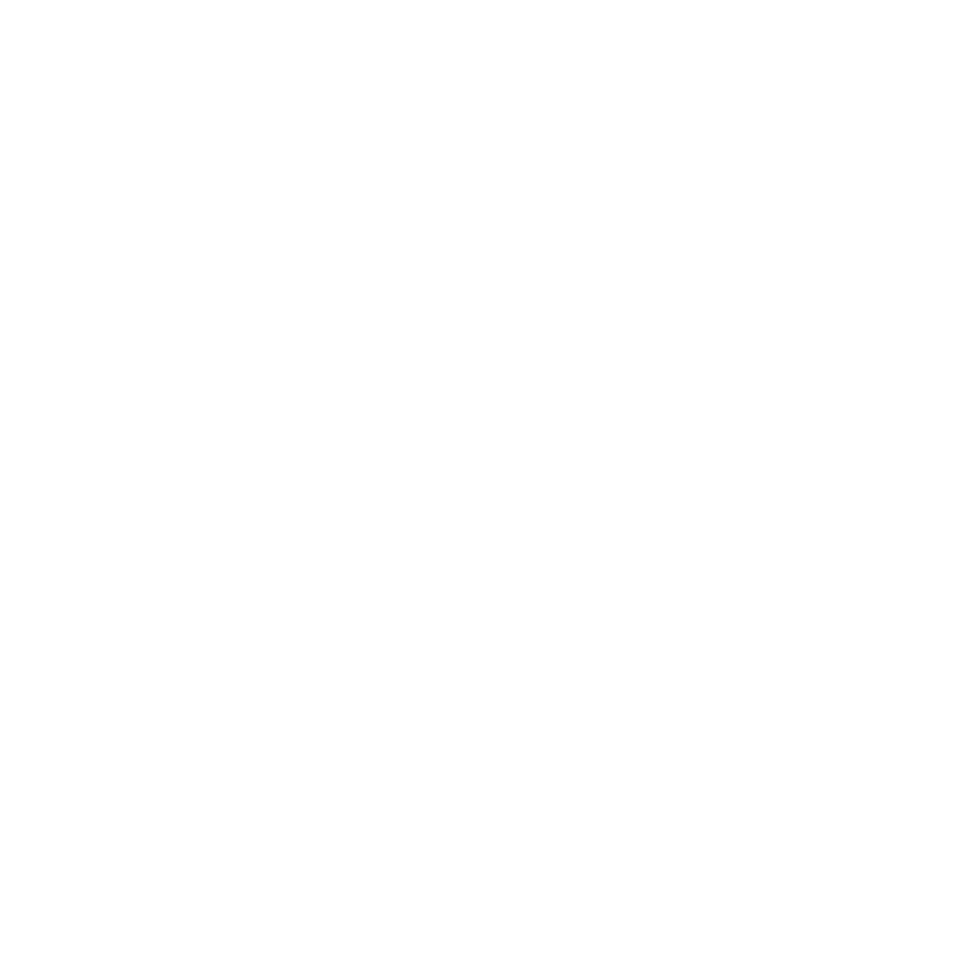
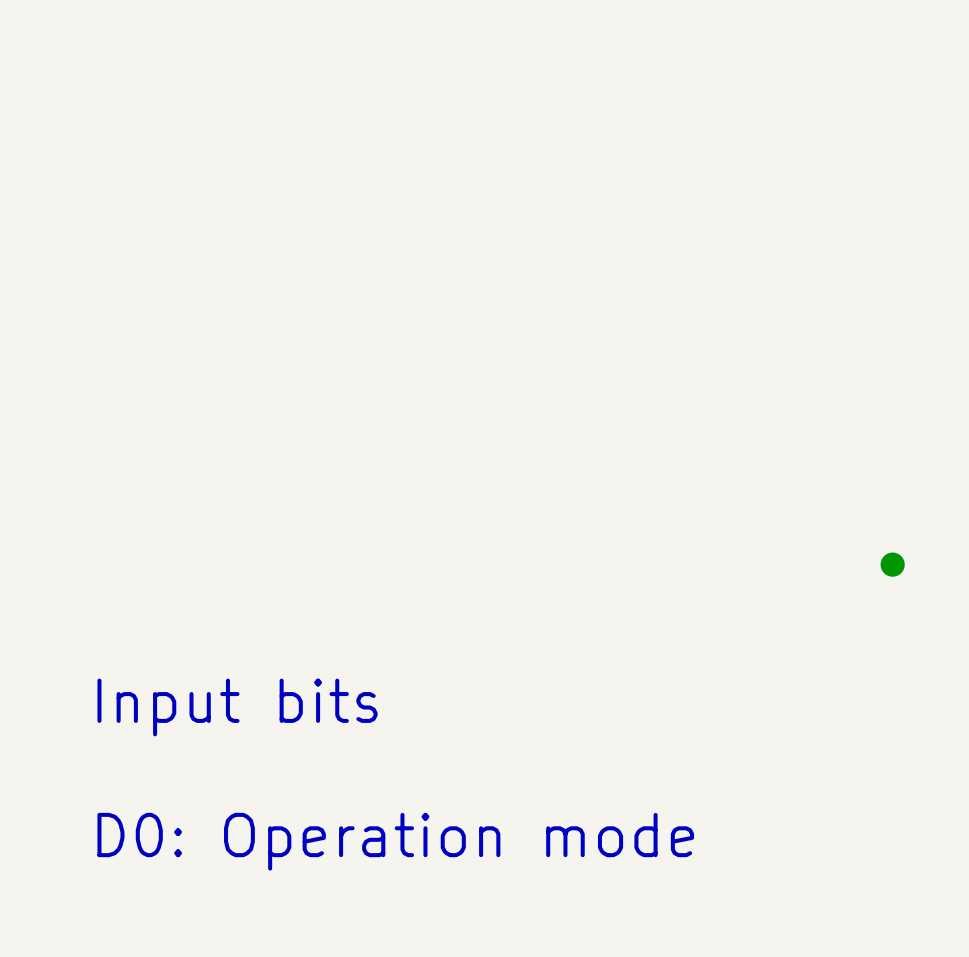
junction: none -> (892, 564)
text: none -> Input bits (237, 707)
text: none -> D0: Operation mode (395, 841)

